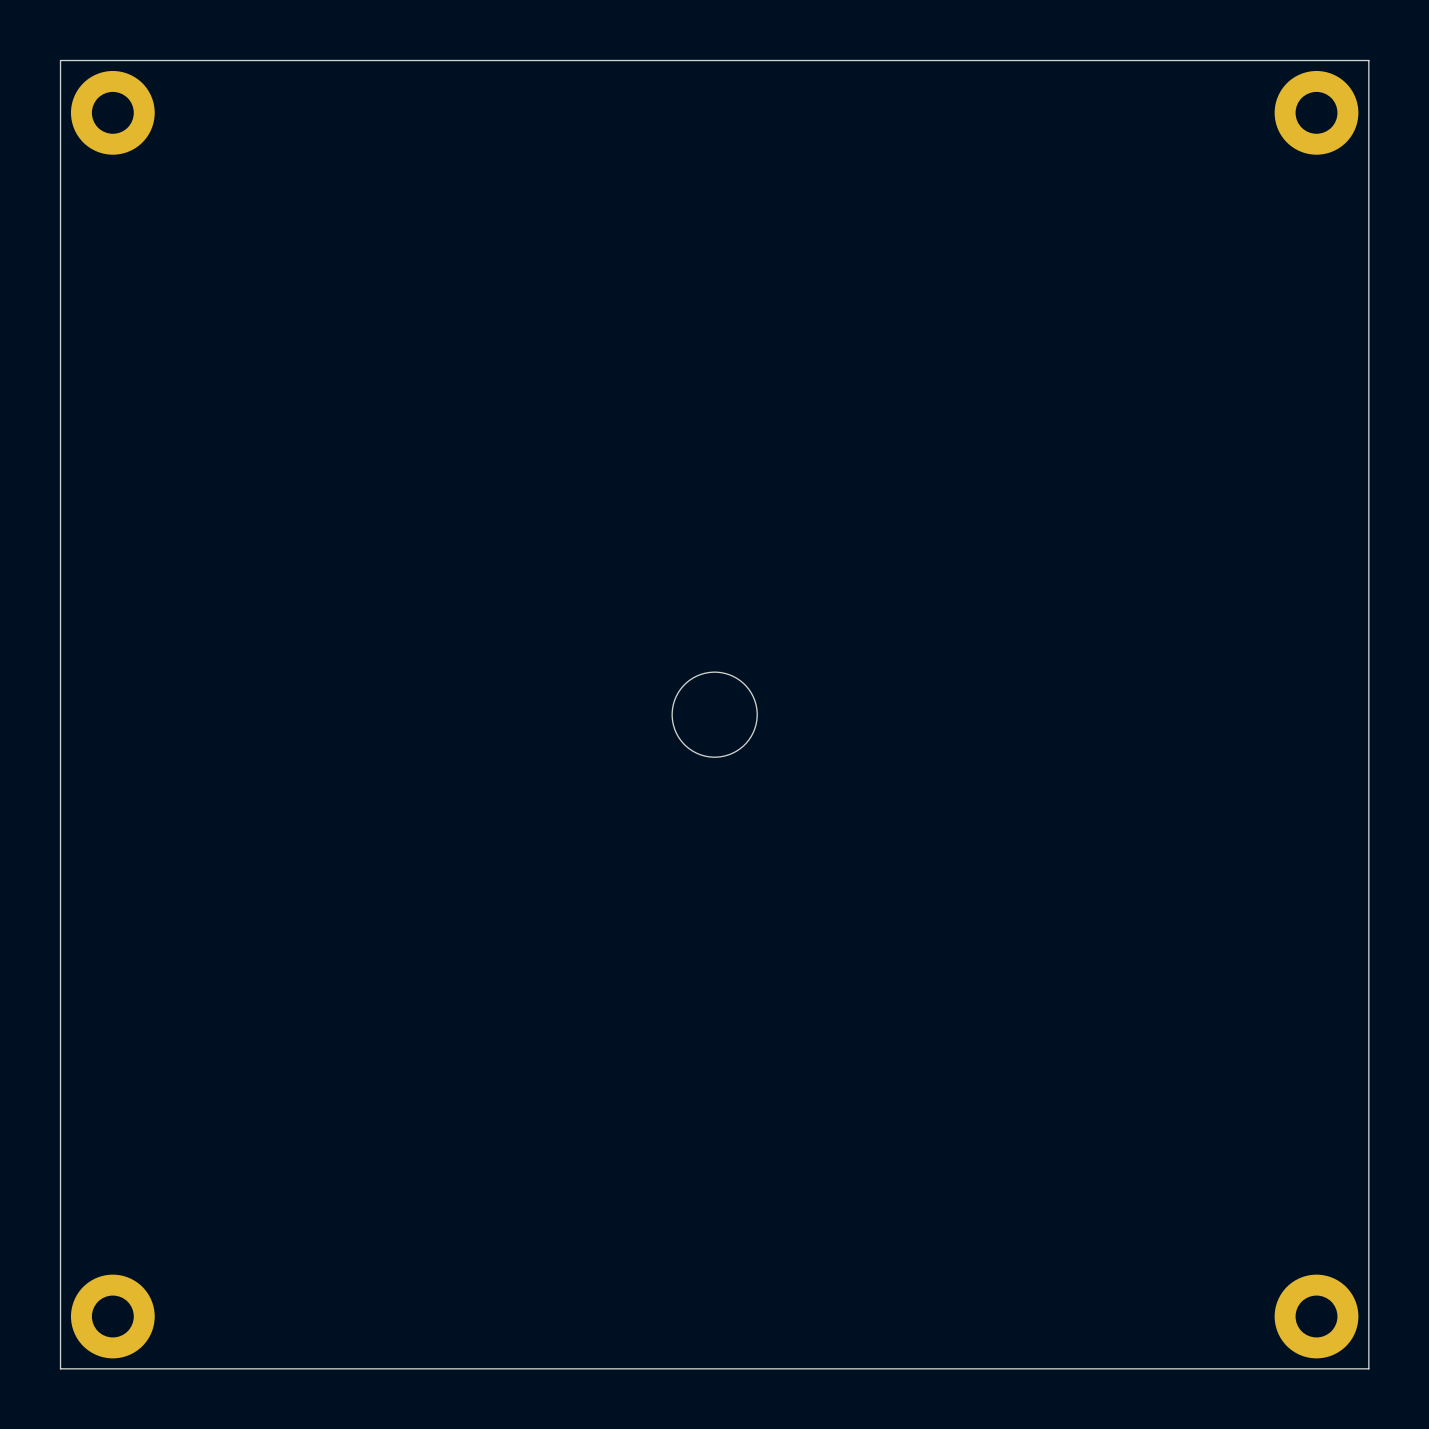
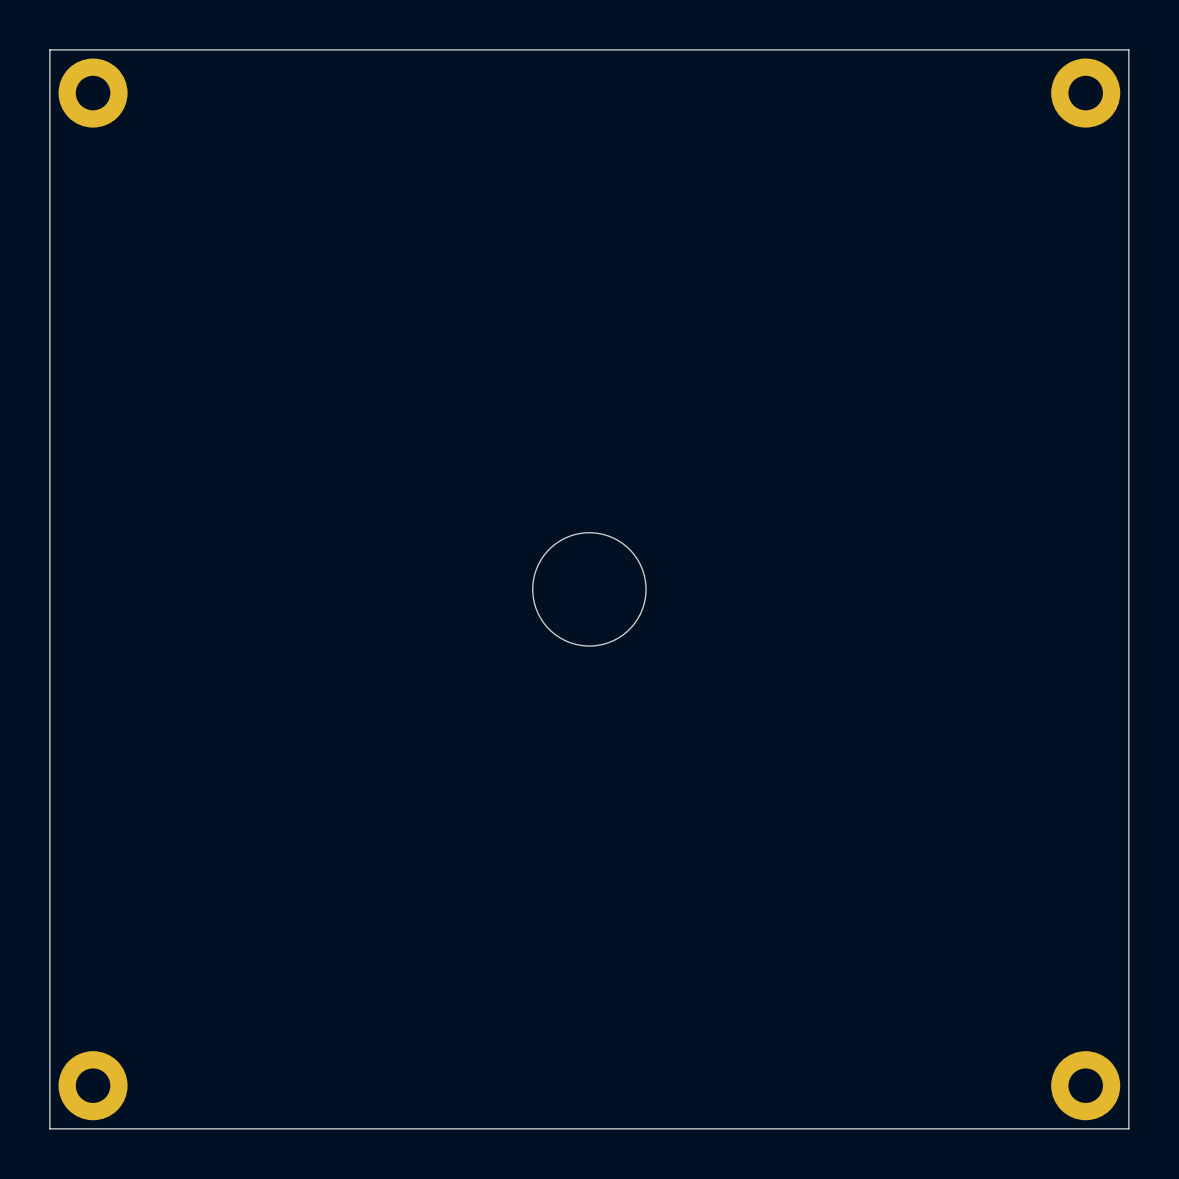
round board edge size: [671, 671, 758, 758] -> [532, 532, 647, 647]

